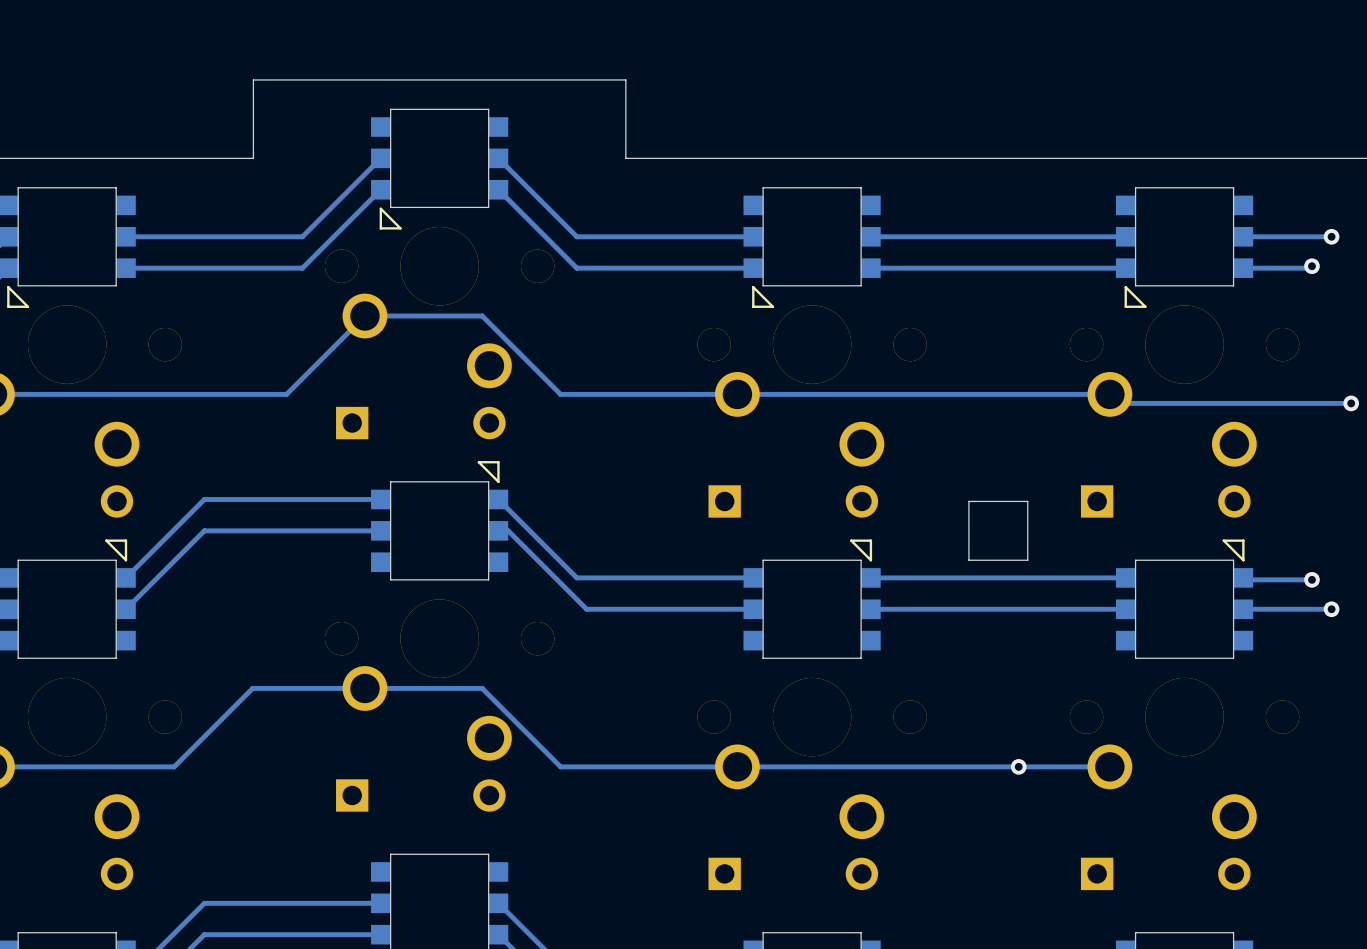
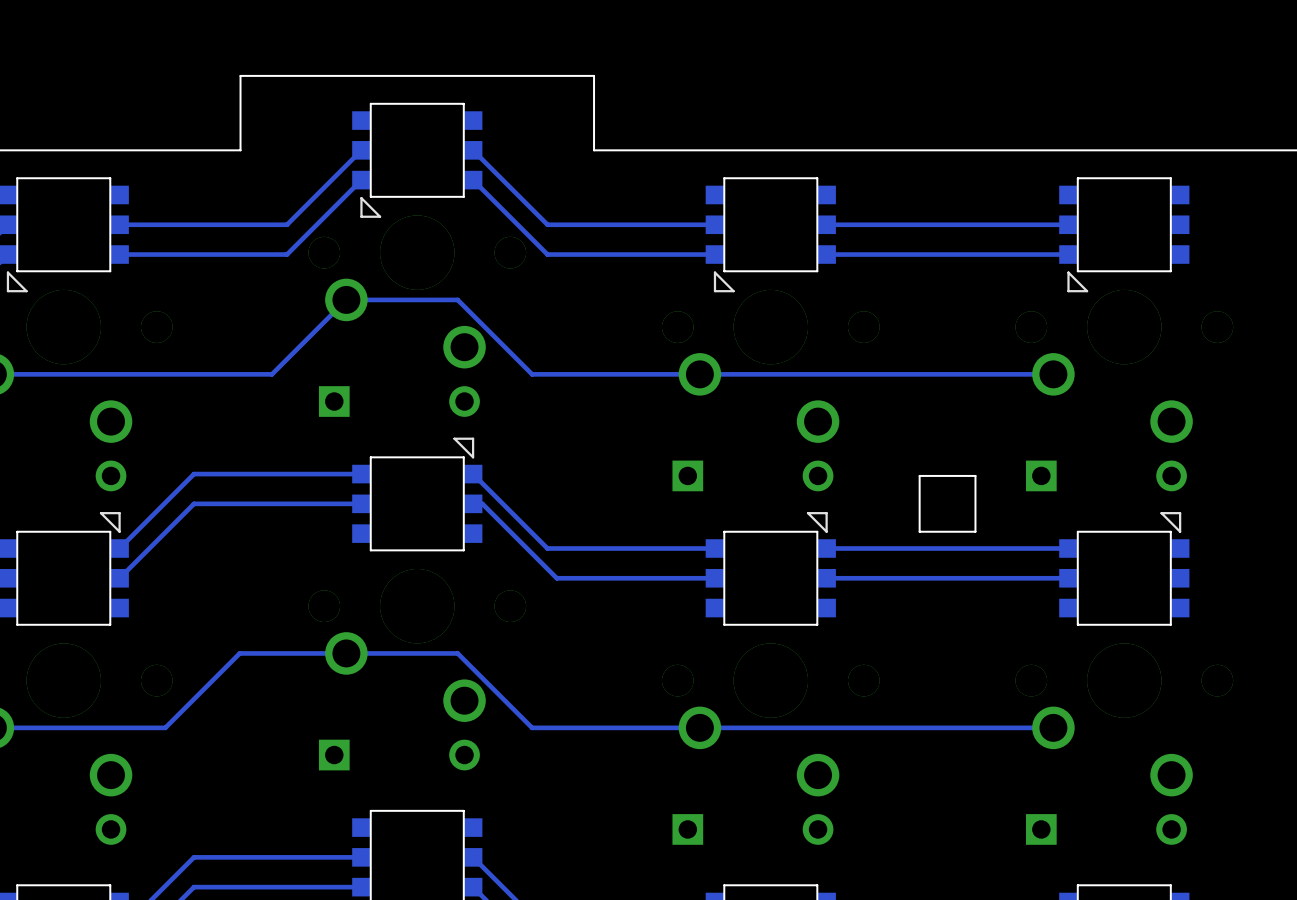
track: (1331, 236) (1243, 236) -> none
via: (1331, 236) -> none
track: (1311, 266) (1310, 268) (1243, 268) -> none
via: (1311, 266) -> none
track: (1109, 394) (1118, 403) (1351, 403) -> none
via: (1351, 403) -> none
track: (1243, 577) (1245, 579) (1311, 579) -> none
via: (1311, 579) -> none
track: (1331, 609) (1243, 609) -> none
via: (1331, 609) -> none
via: (1018, 766) -> none

